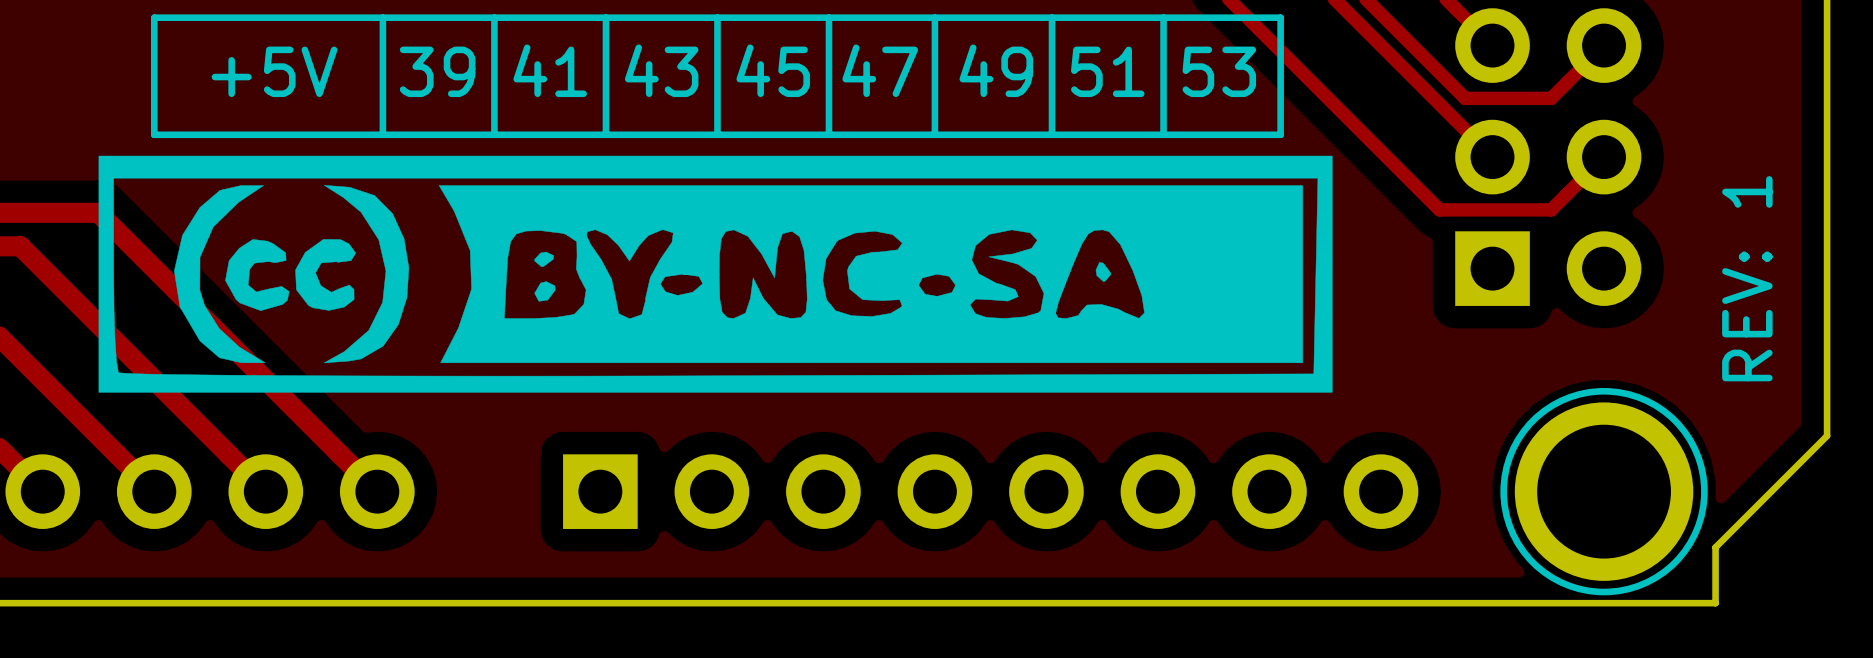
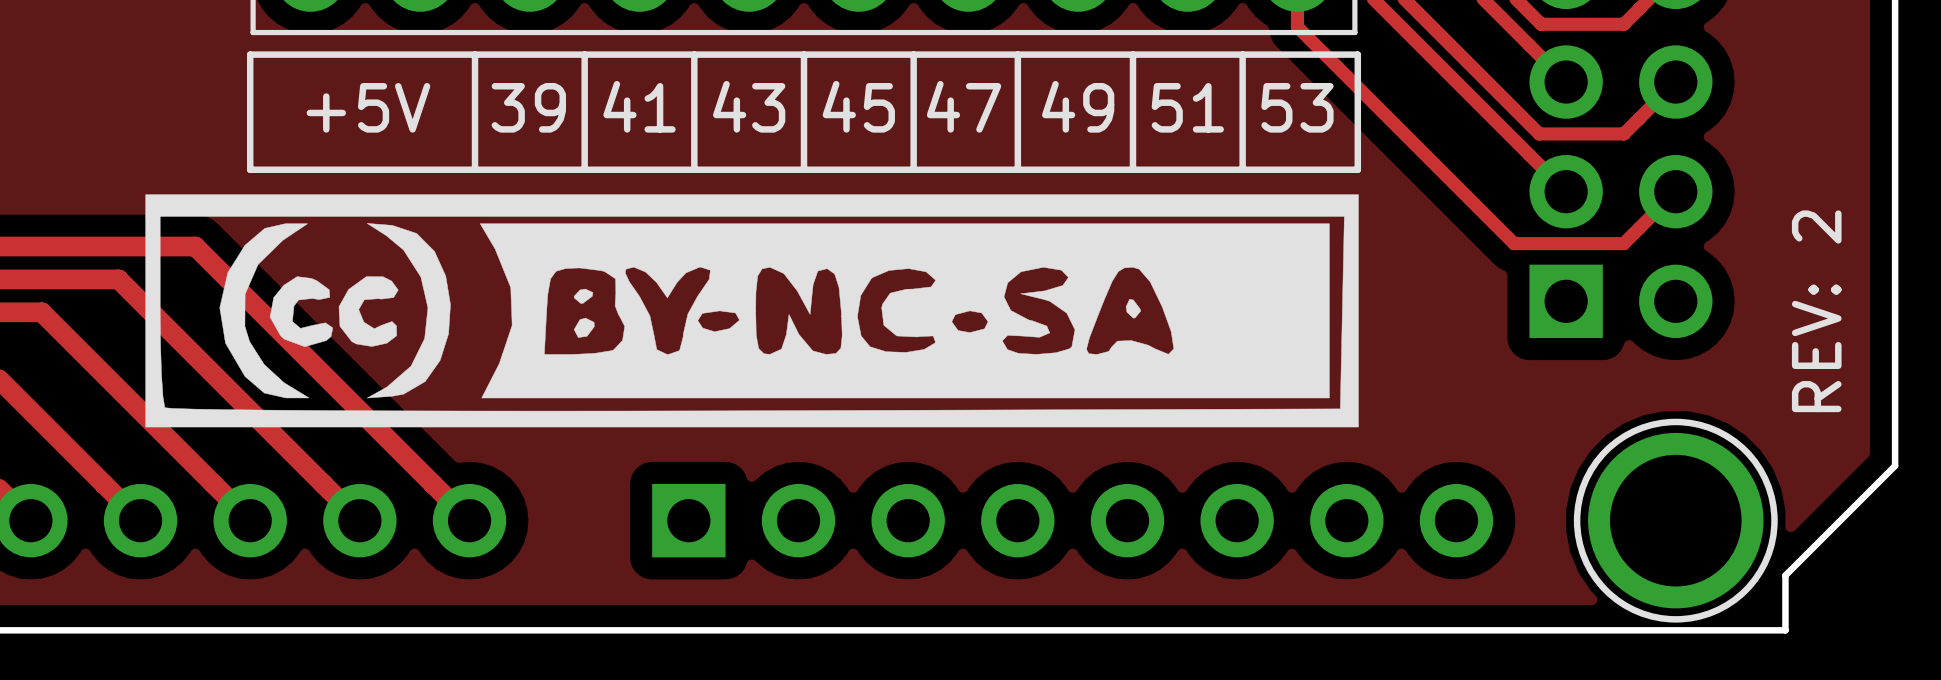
drawing position: (715, 274) -> (752, 310)
text: REV: 1 (1747, 278) -> REV: 2 (1816, 311)

